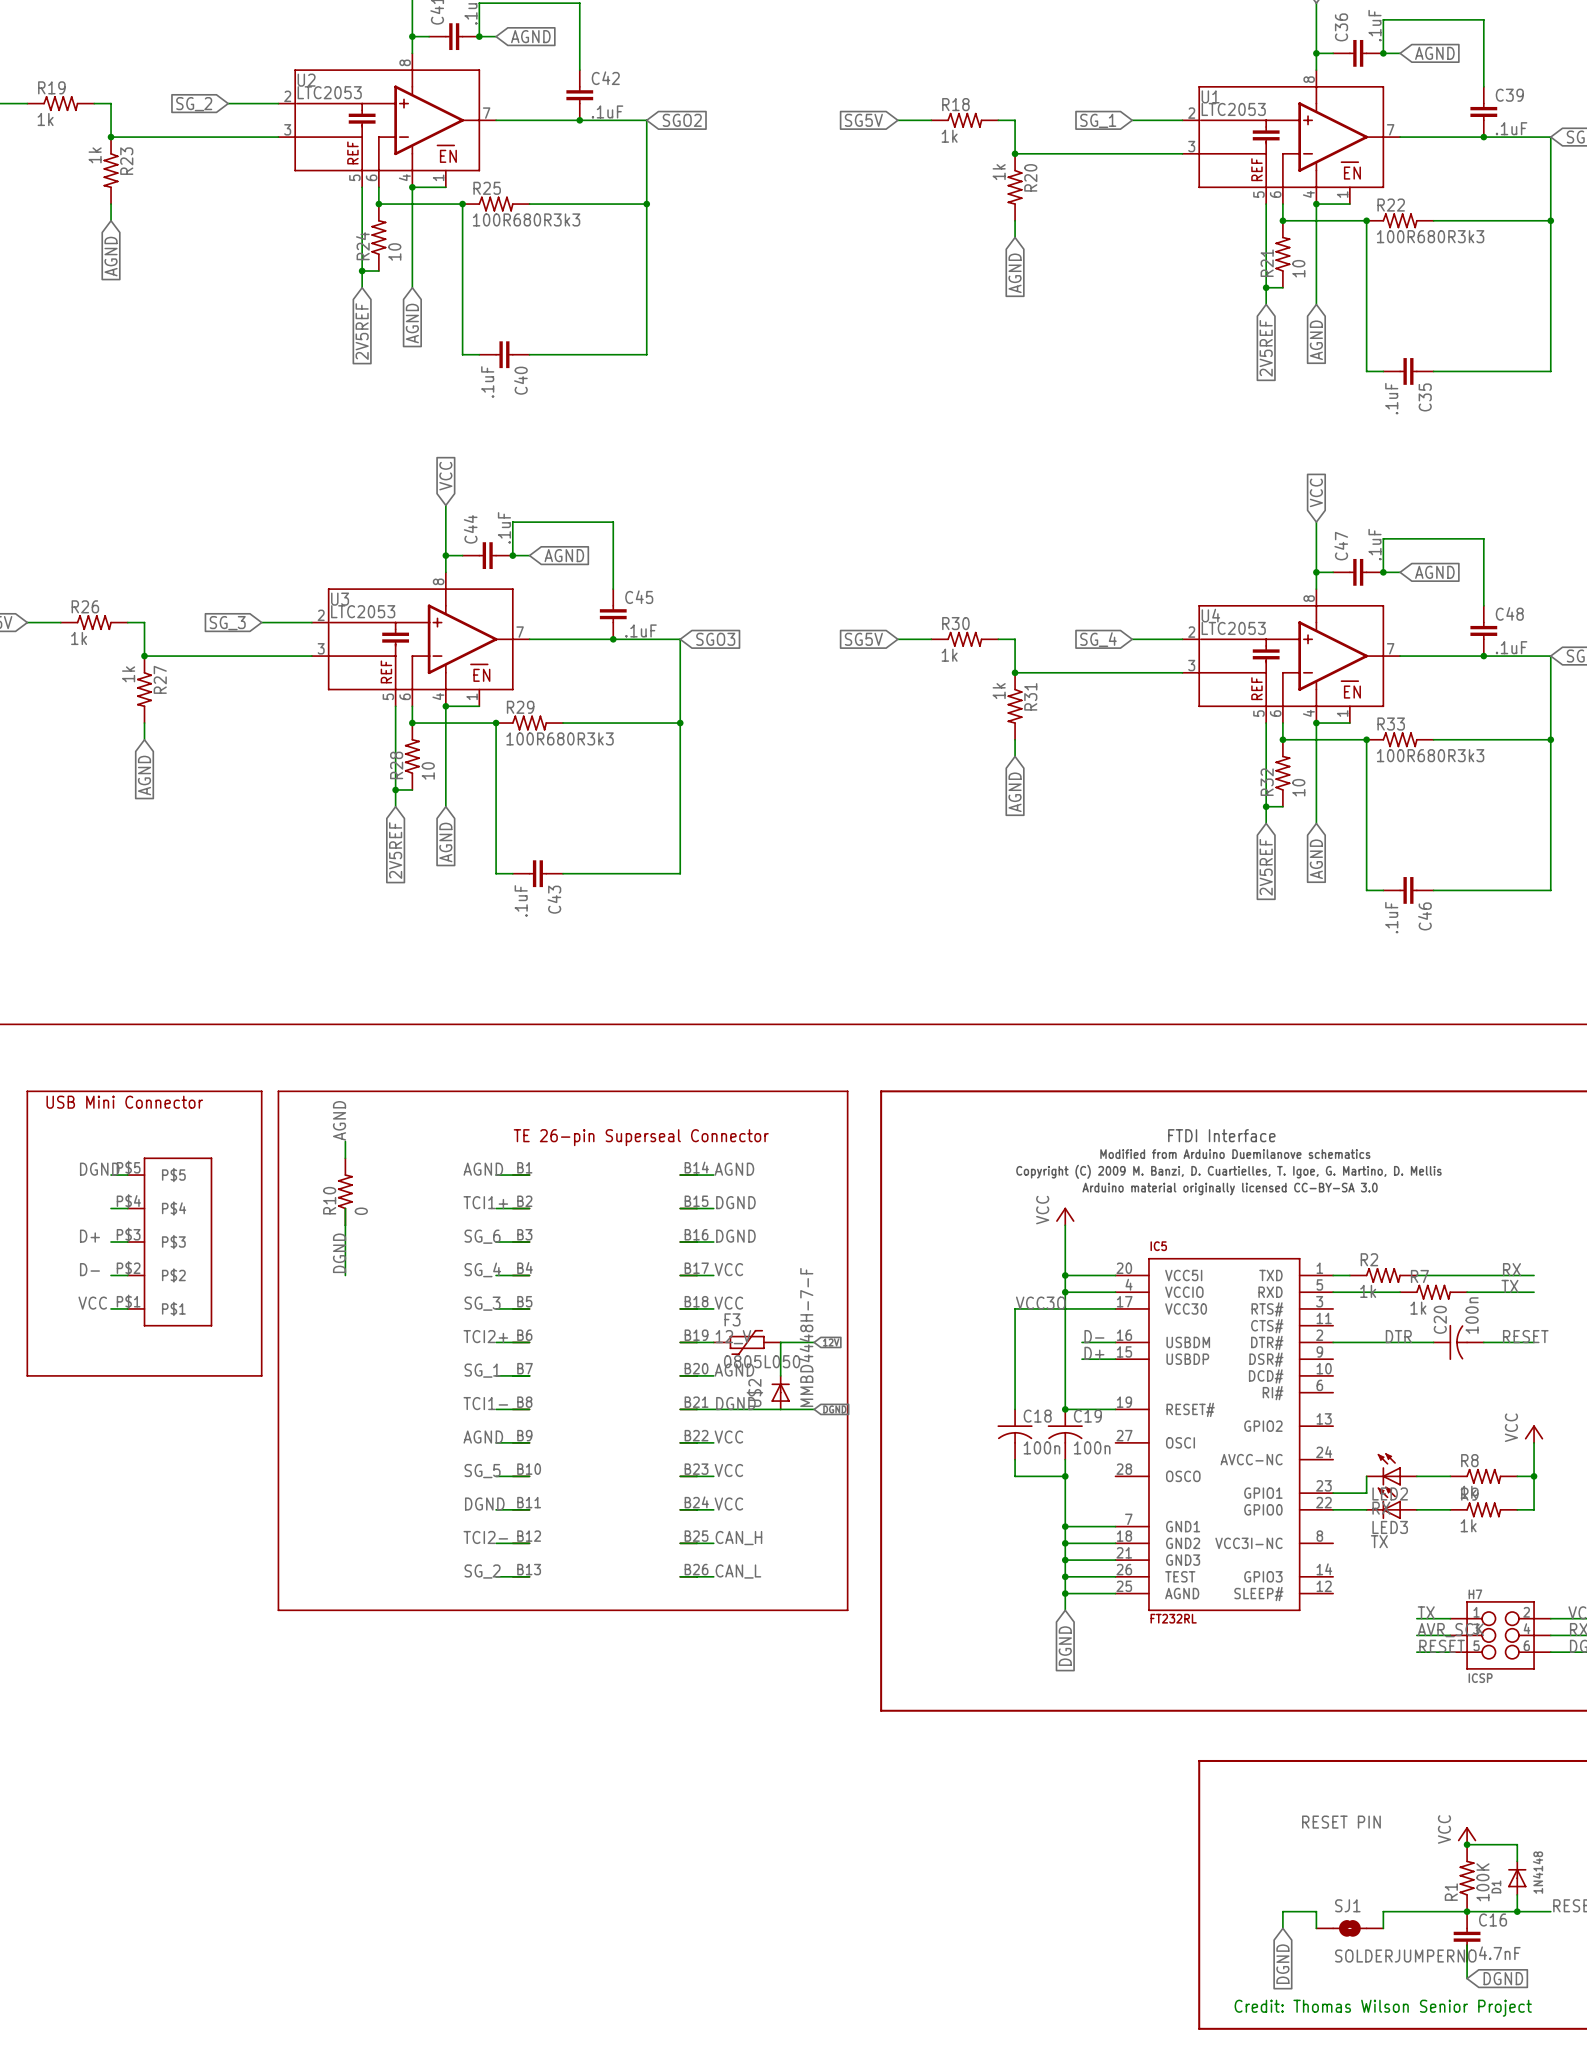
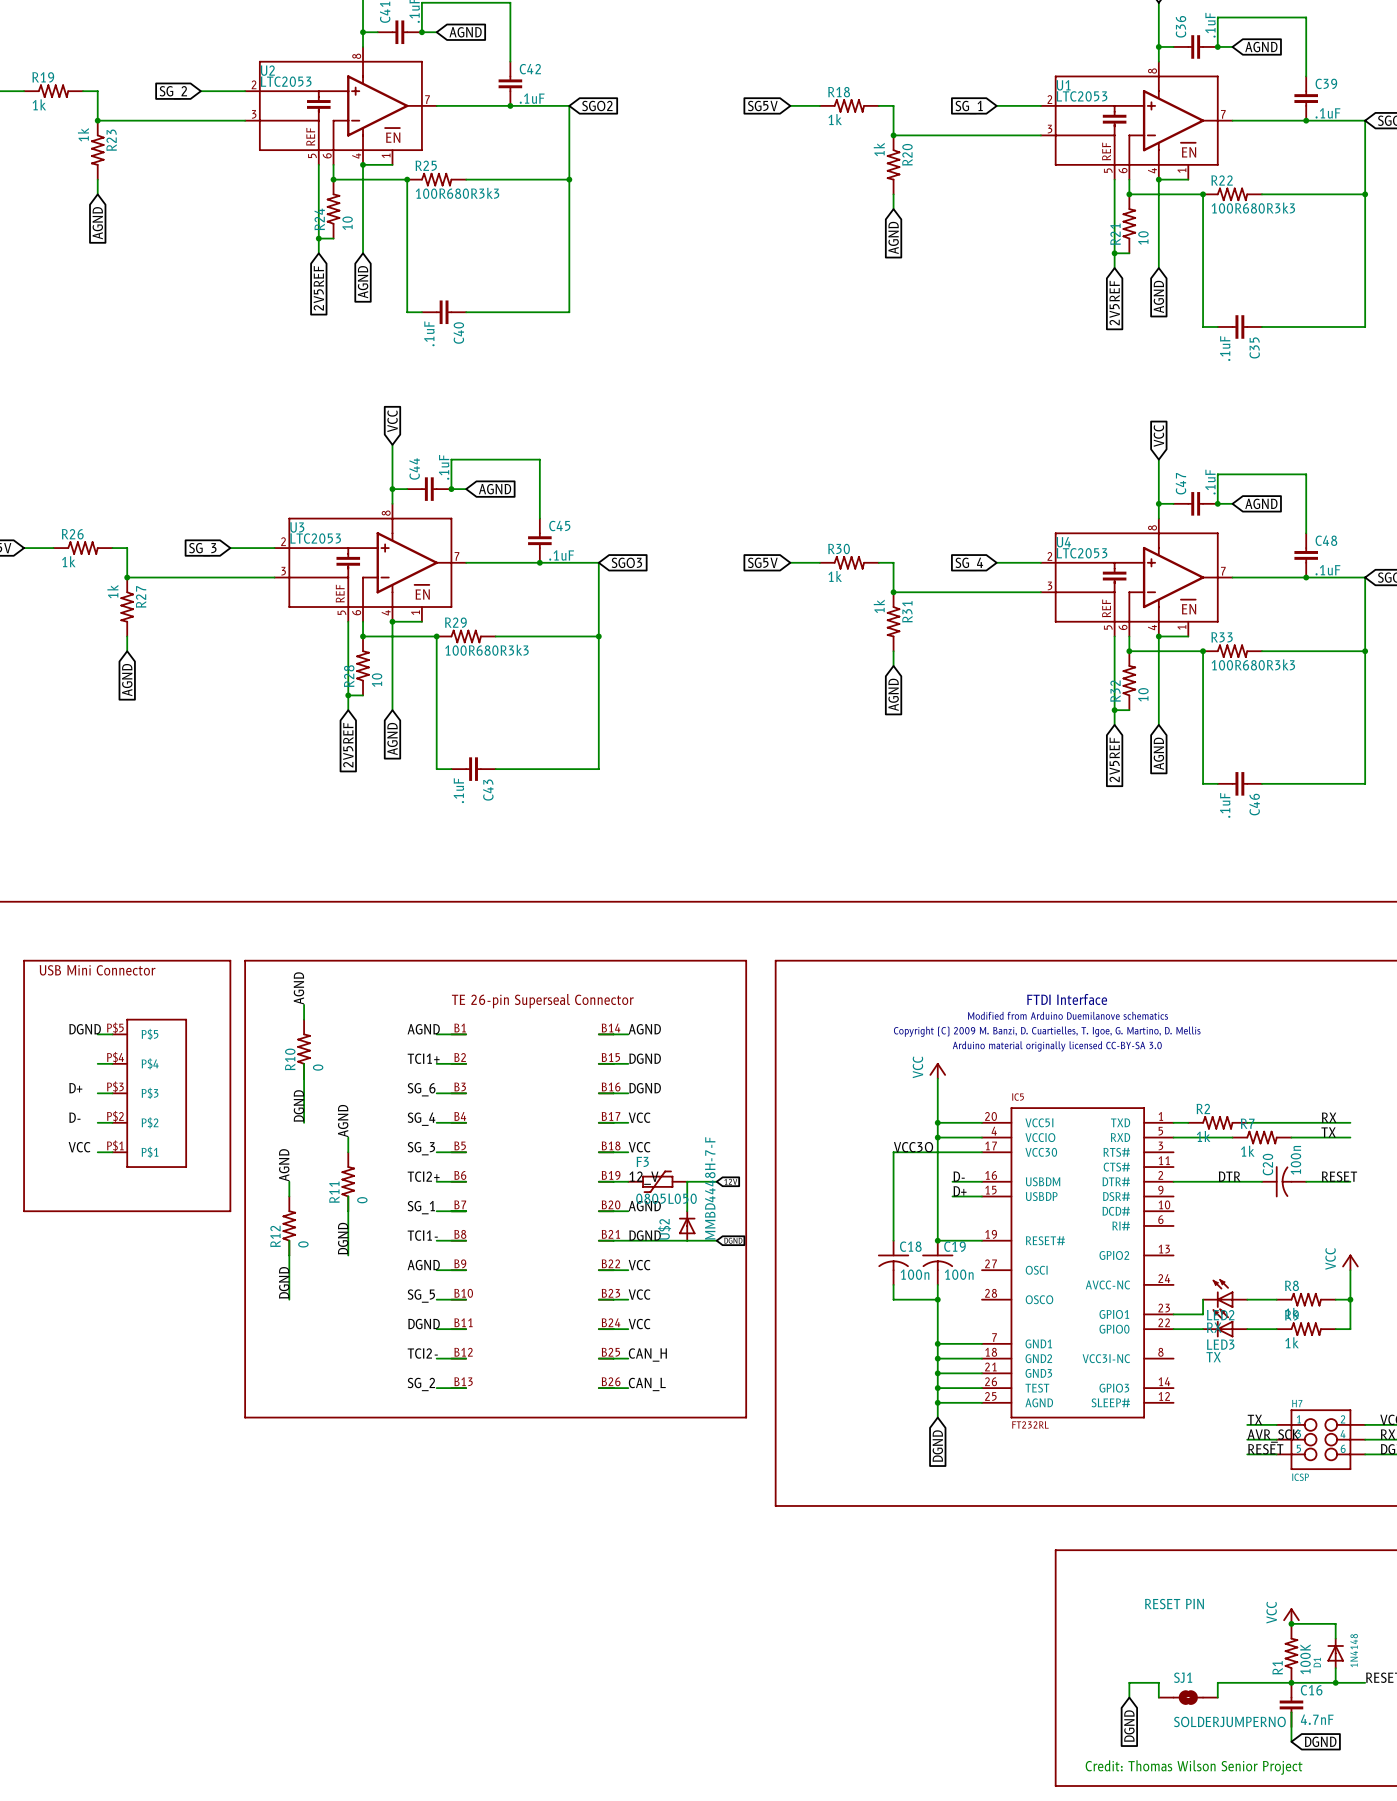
label: none -> AGND (343, 1121)
wire: none -> (348, 1137) (348, 1152)
label: none -> AGND (284, 1165)
wire: none -> (289, 1181) (289, 1196)
R11: none -> 0 (348, 1181)
wire: none -> (348, 1196) (348, 1255)
R12: none -> 0 (289, 1225)
label: none -> DGND (343, 1238)
wire: none -> (289, 1240) (289, 1299)
label: none -> DGND (284, 1282)

